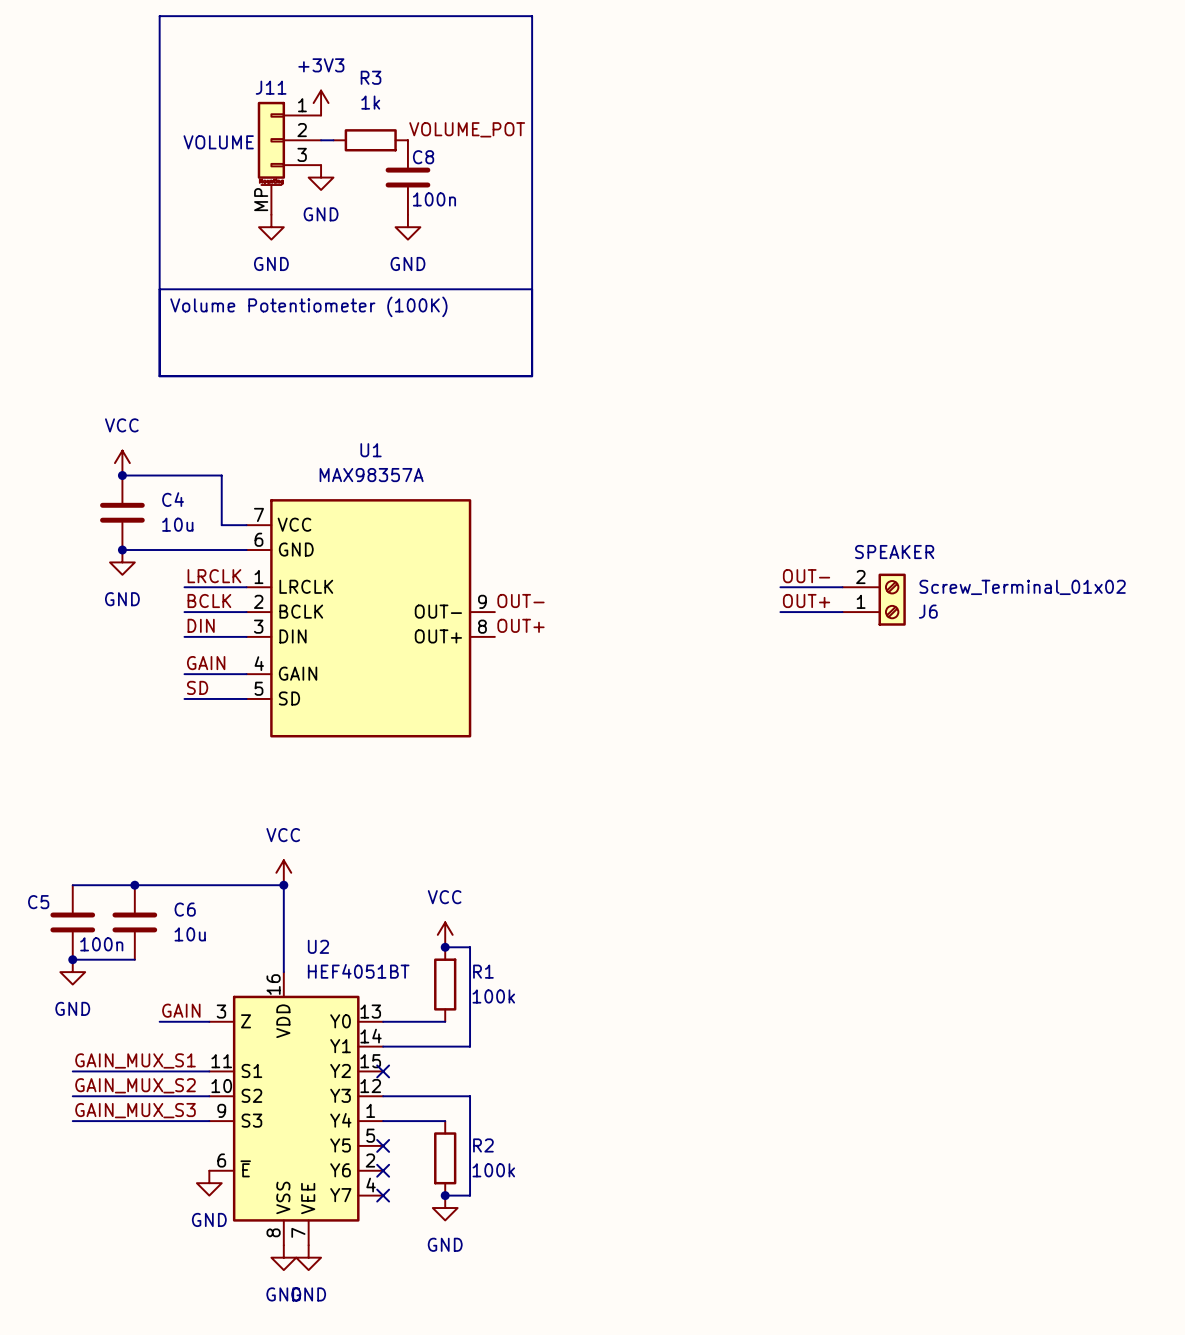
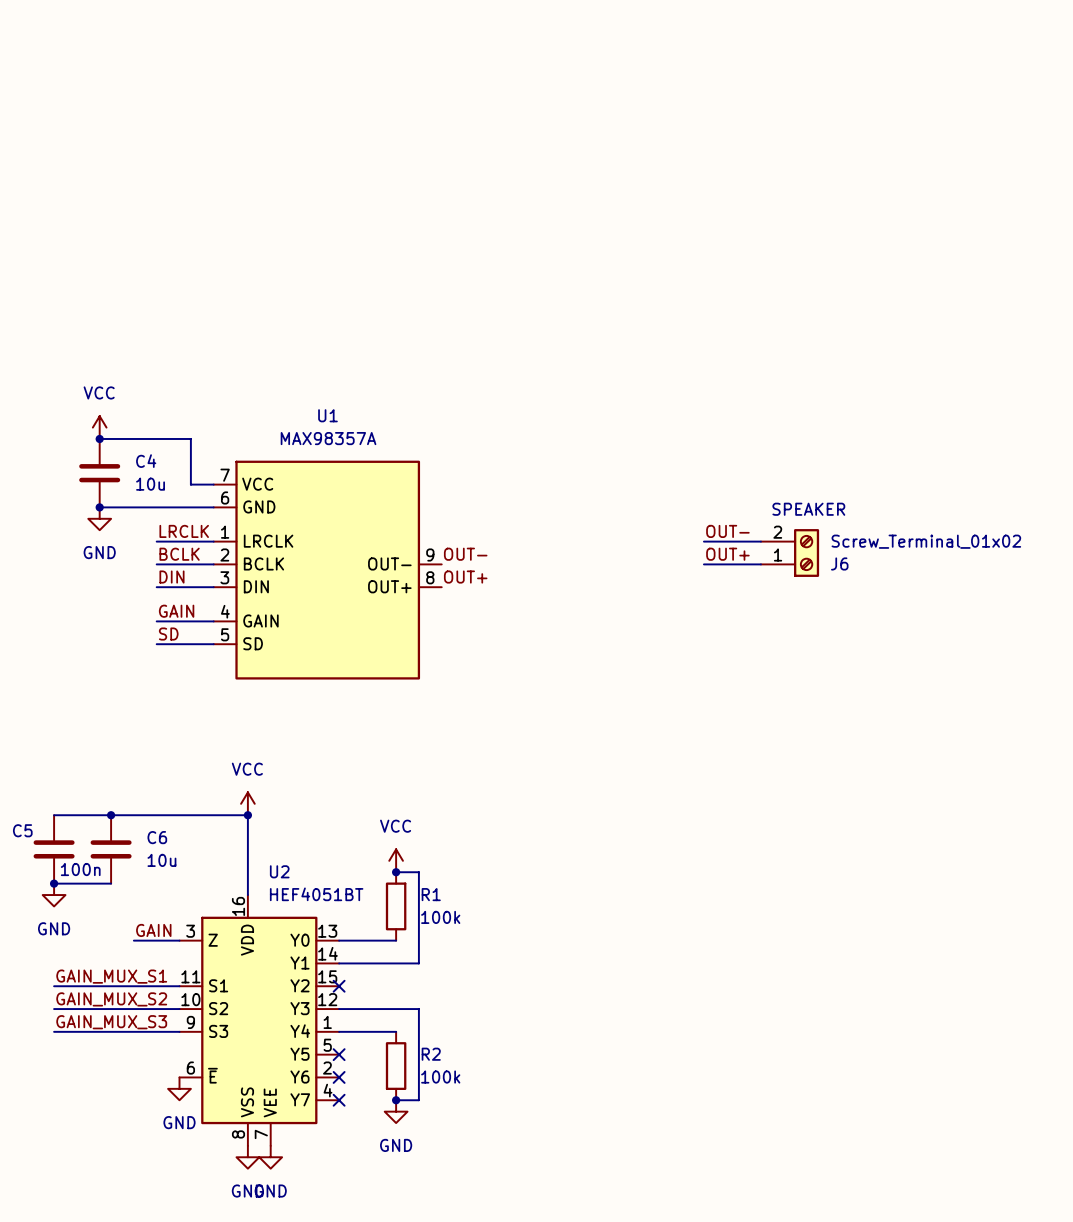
line: (159, 16) (532, 16) (532, 376) (159, 376) (159, 16) -> none
power symbol: +3V3 (321, 103) -> none
label: VOLUME_POT (467, 129) -> none
wire: (321, 140) (333, 140) -> none
R3: 1k (370, 140) -> none
J11: (289, 158) -> none
power symbol: GND (321, 177) -> none
C8: 100n (407, 177) -> none
power symbol: GND (271, 227) -> none
power symbol: GND (407, 227) -> none
line: (159, 289) (532, 289) -> none
text: Volume Potentiometer (100K) (308, 306) -> none

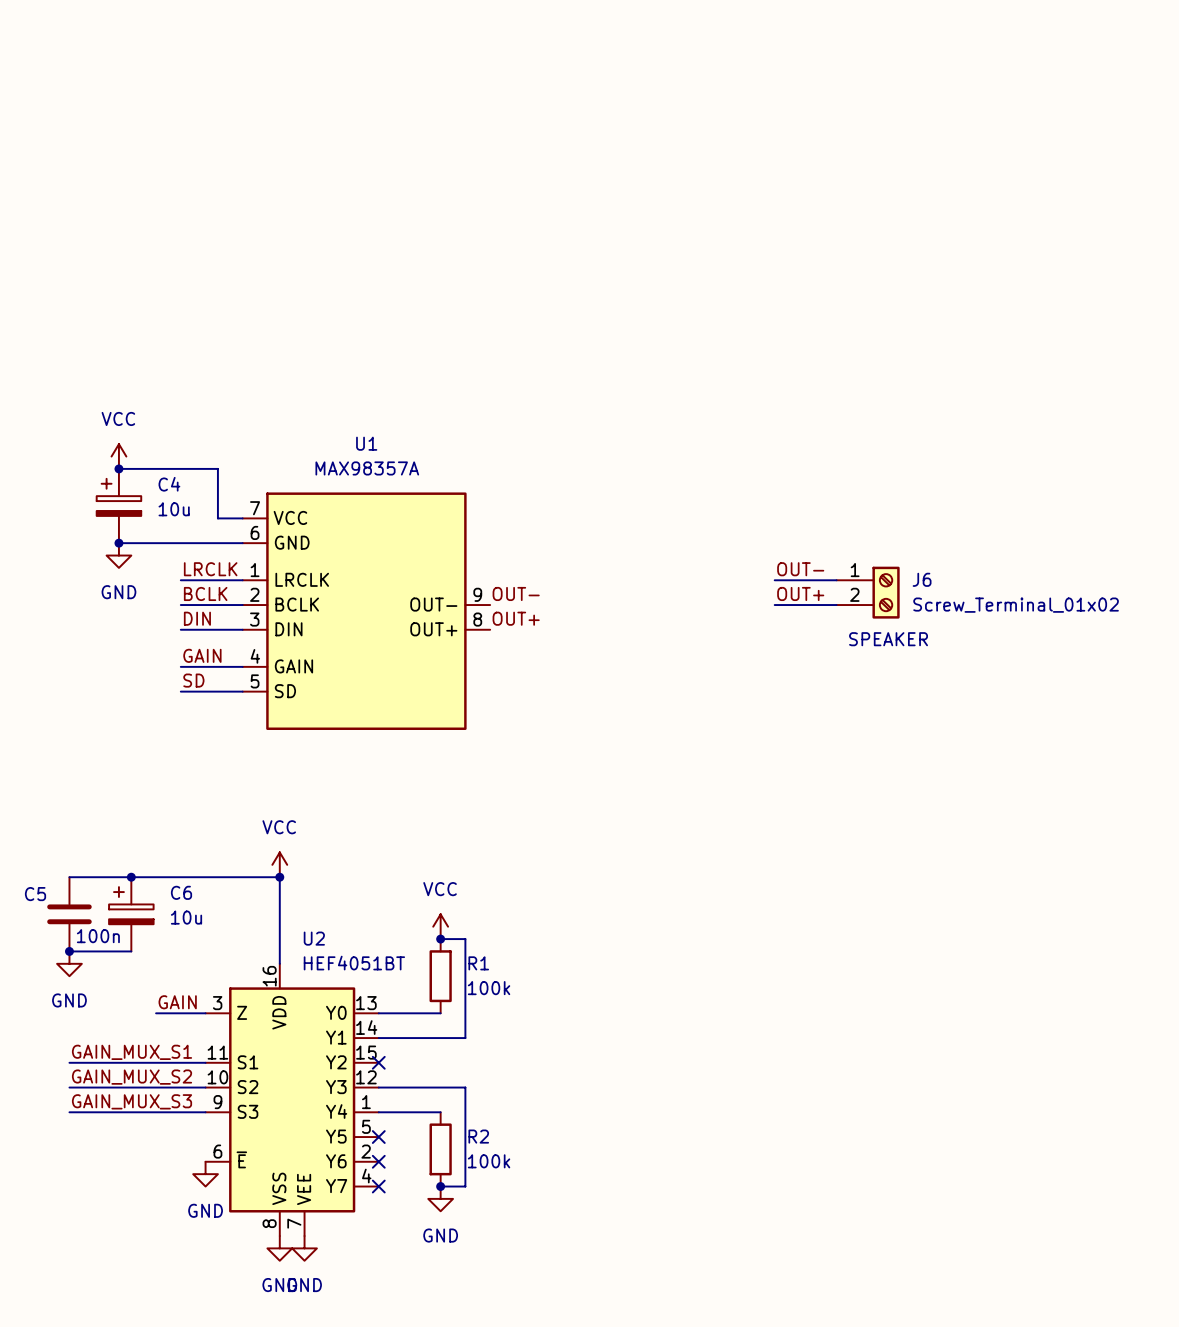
C4 symbol: [79, 438, 121, 508] -> [96, 468, 142, 544]
J6 flip: as is (806, 553) -> up-down (886, 592)
C6 symbol: [90, 815, 132, 884] -> [109, 877, 154, 952]

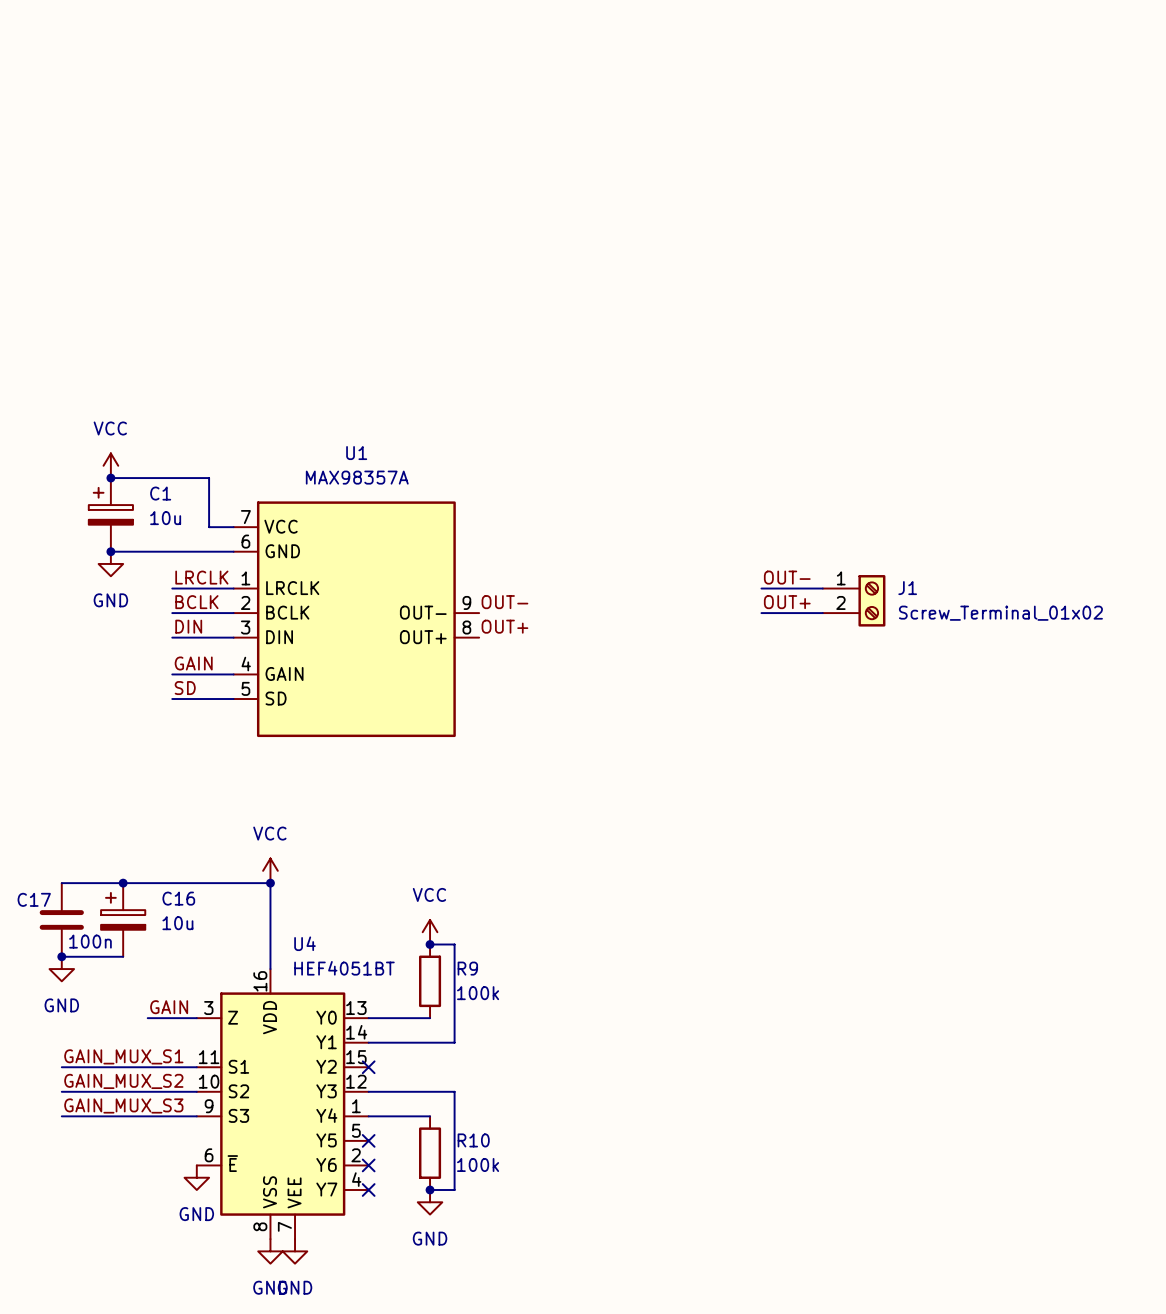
C4 name: C4 (169, 484) -> C1 (160, 493)
J6 name: J6 (922, 579) -> J1 (907, 588)
J6 text: SPEAKER (888, 639) -> none
C6 name: C6 (181, 892) -> C16 (178, 898)
C5 name: C5 (35, 894) -> C17 (34, 899)
U2 name: U2 (314, 938) -> U4 (305, 943)
R1 name: R1 (478, 963) -> R9 (467, 968)
R2 name: R2 (478, 1136) -> R10 (473, 1140)

